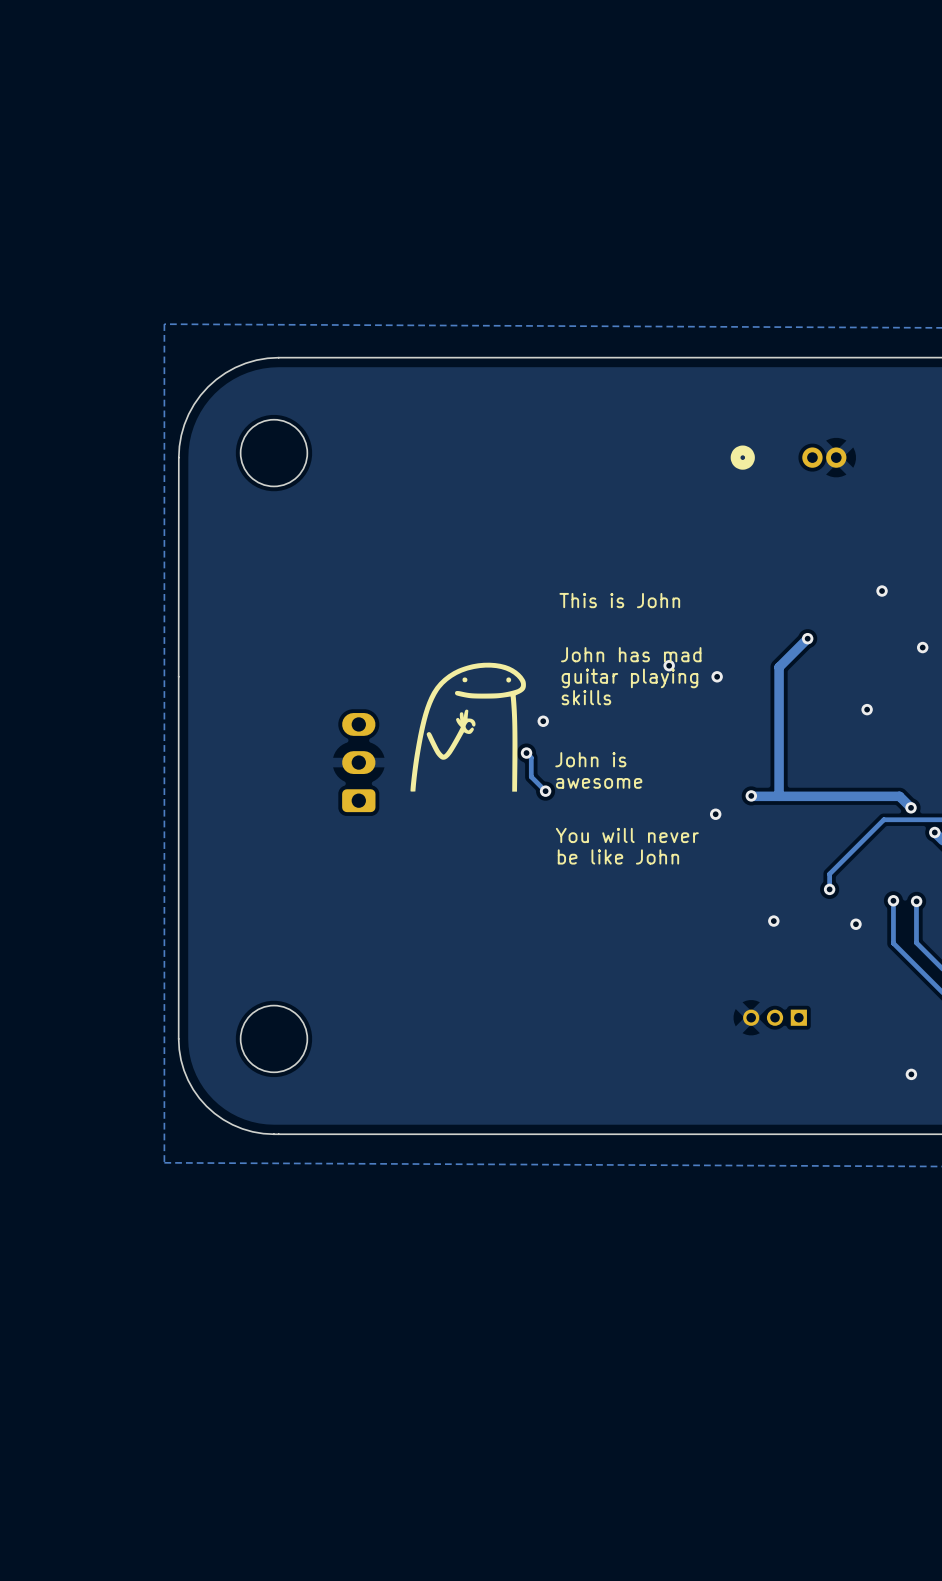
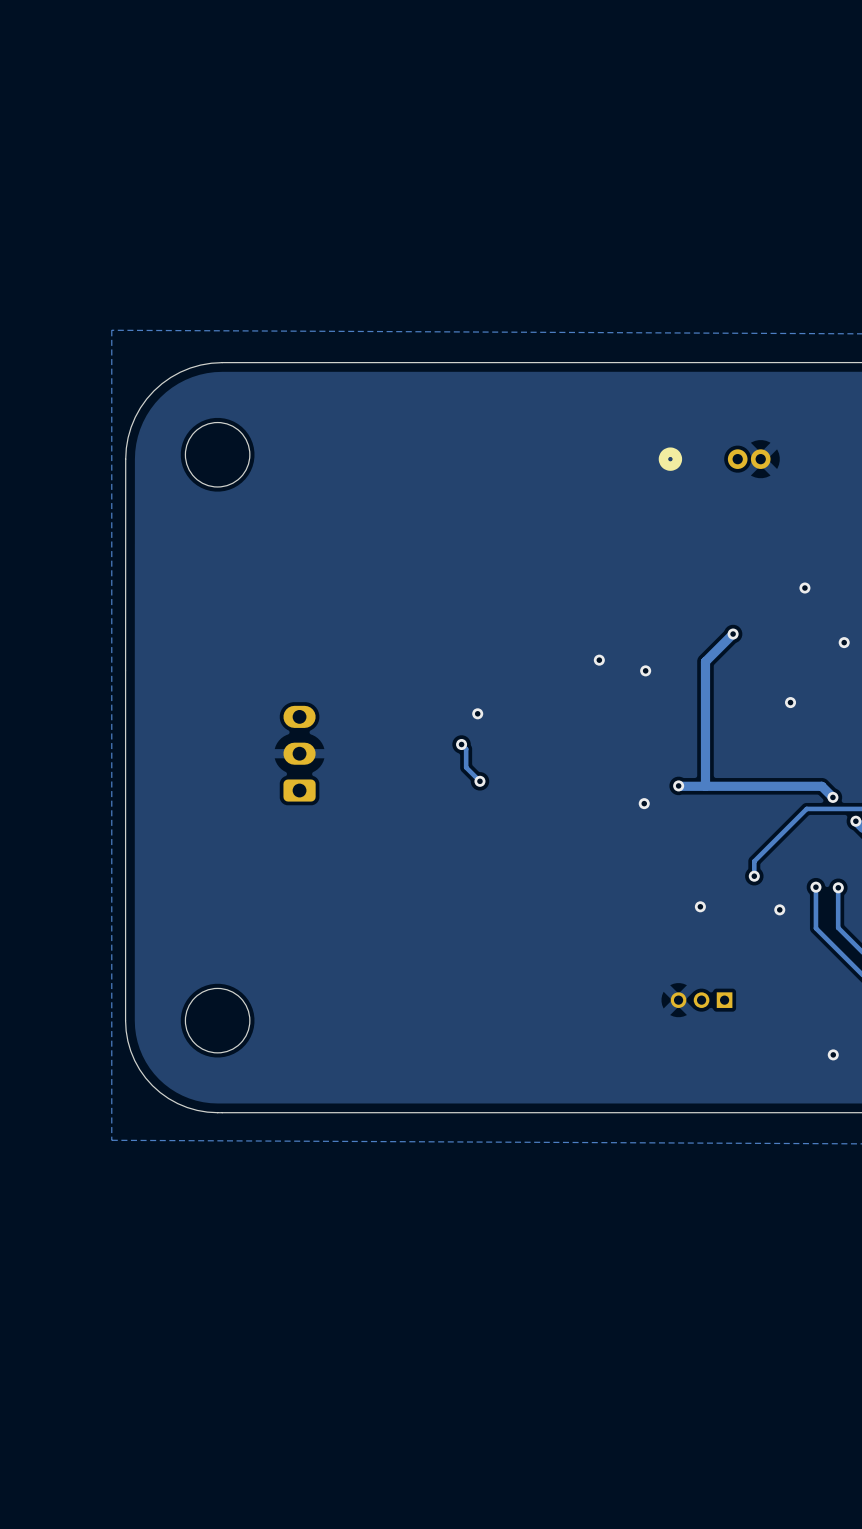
text: This is John (619, 600) -> none
text: John has mad (631, 654) -> none
drawing: [410, 662, 526, 792] -> none
text: guitar playing (629, 678) -> none
text: skills (586, 697) -> none
text: John is (590, 759) -> none
text: awesome (599, 783) -> none
text: You will never (627, 835) -> none
text: be like John (618, 856) -> none

